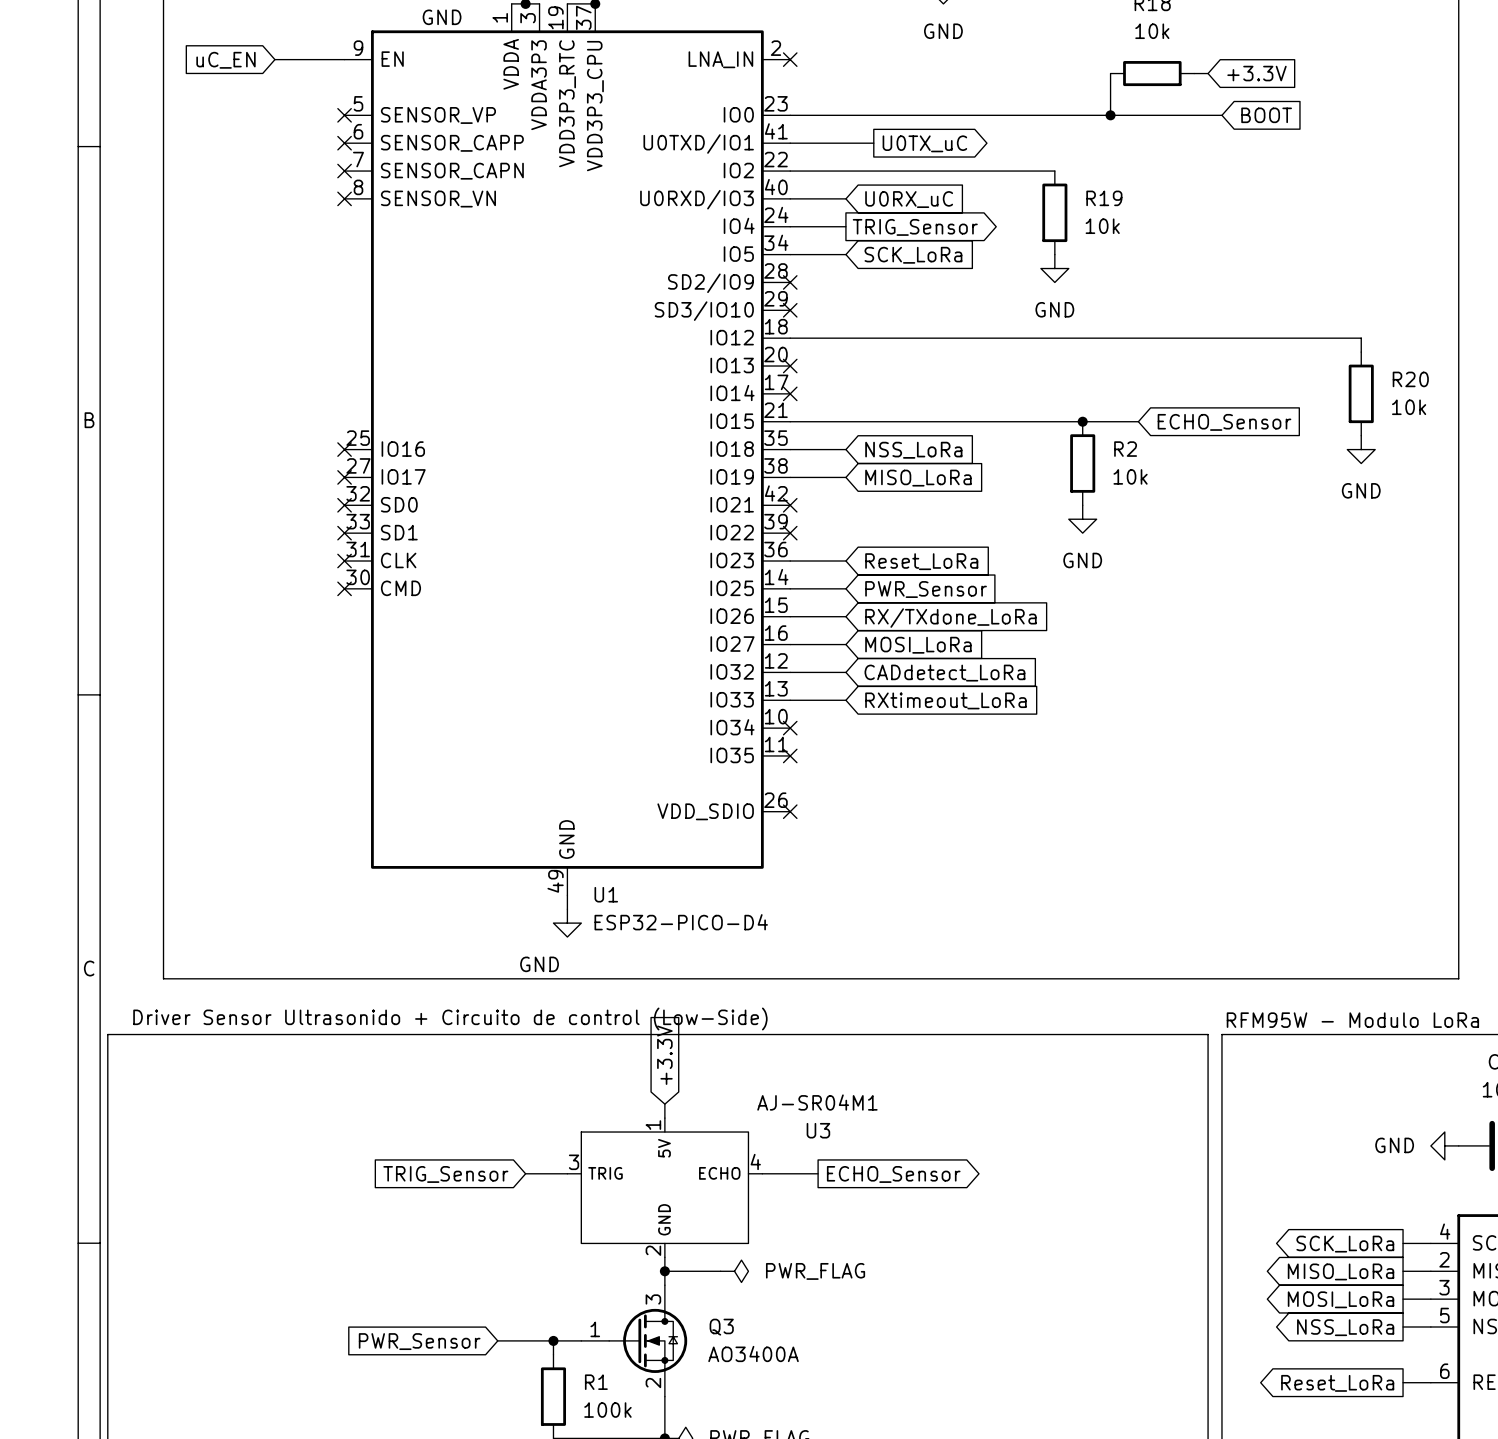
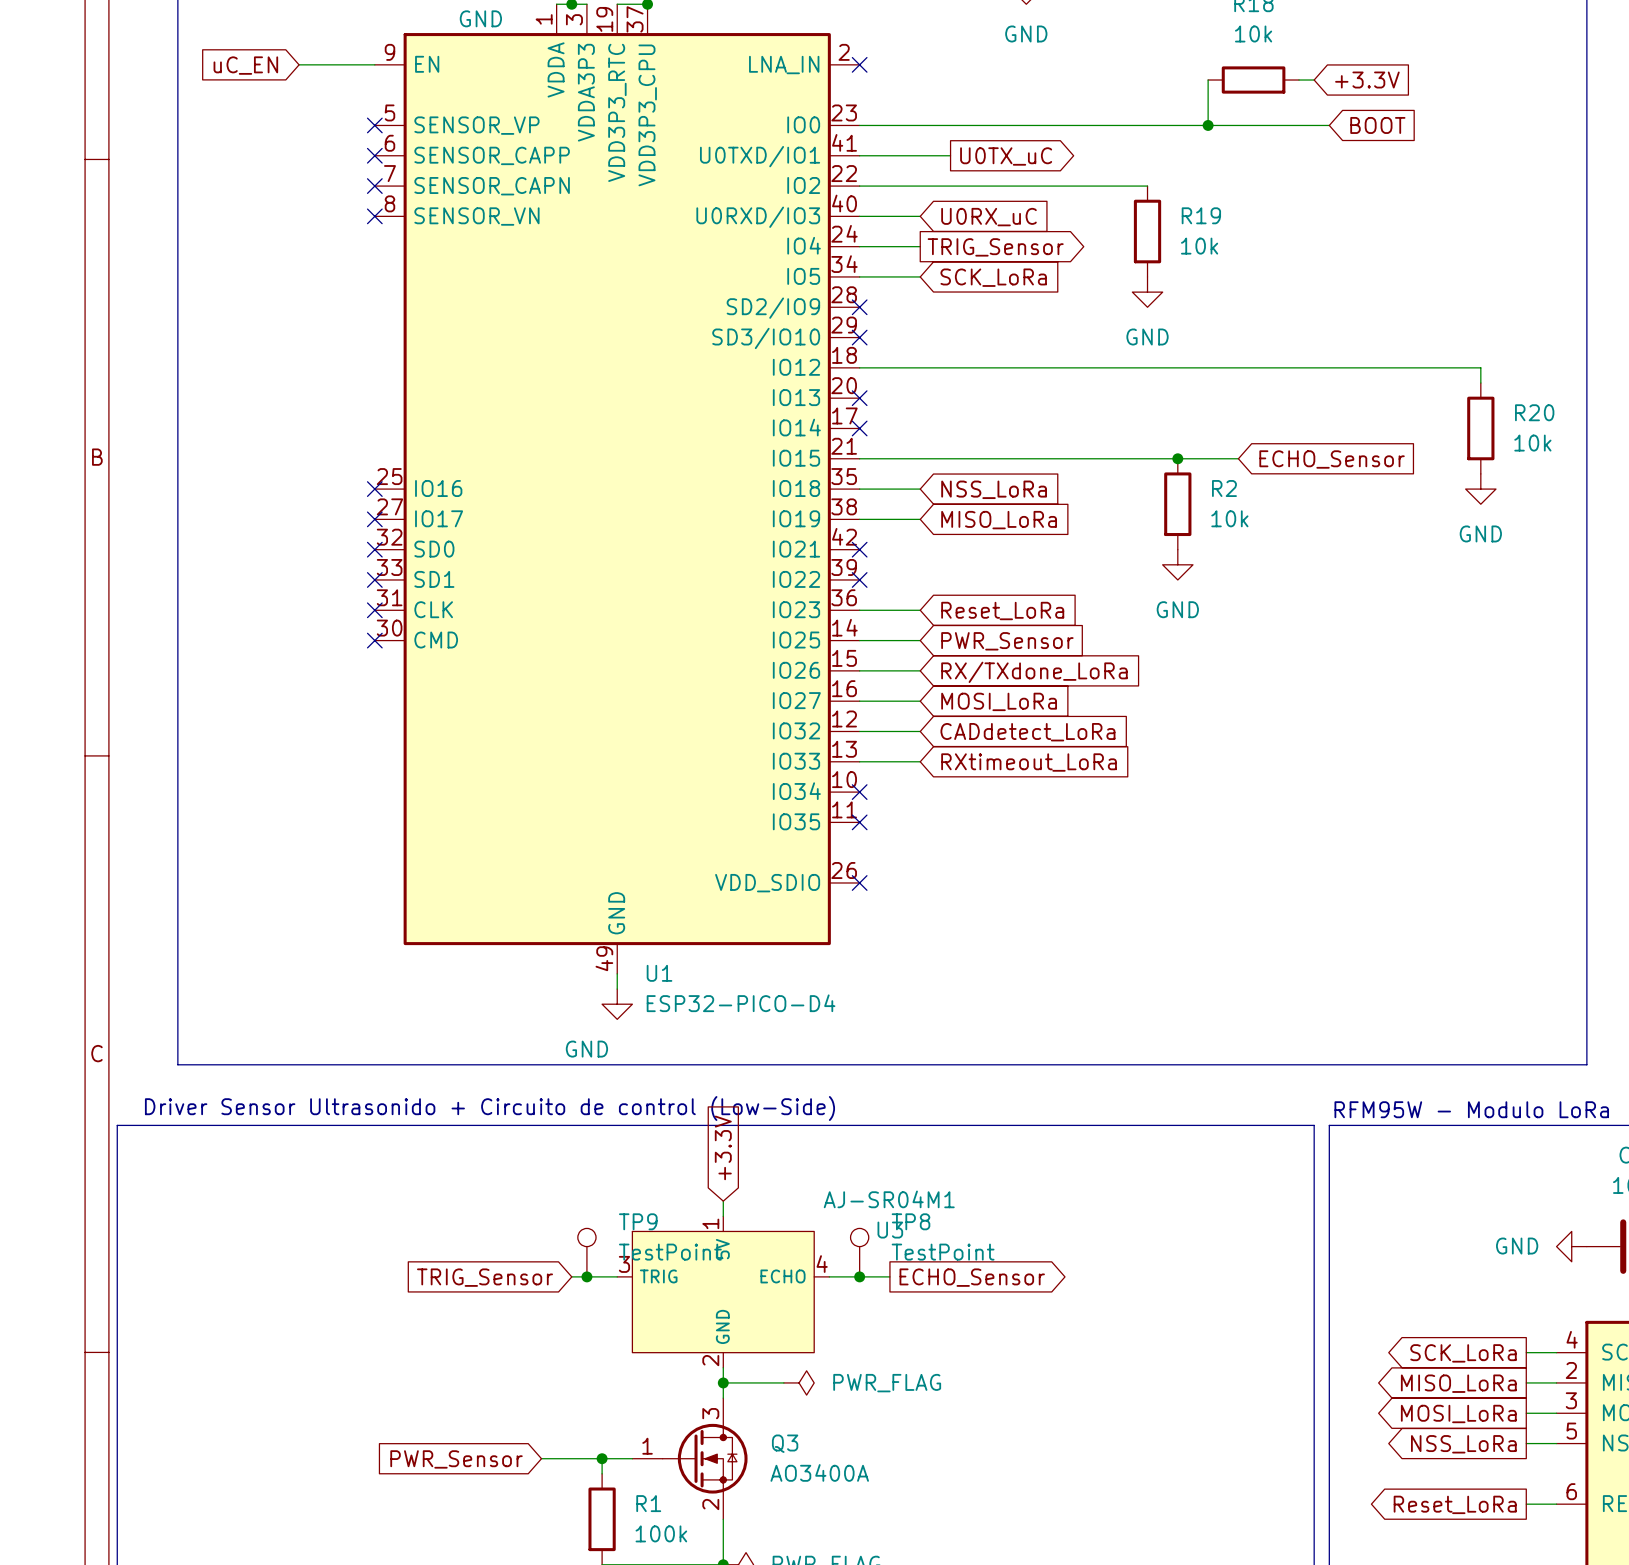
TP9: none -> TestPoint (586, 1252)
TP8: none -> TestPoint (859, 1252)
junction: none -> (586, 1276)
junction: none -> (859, 1276)

